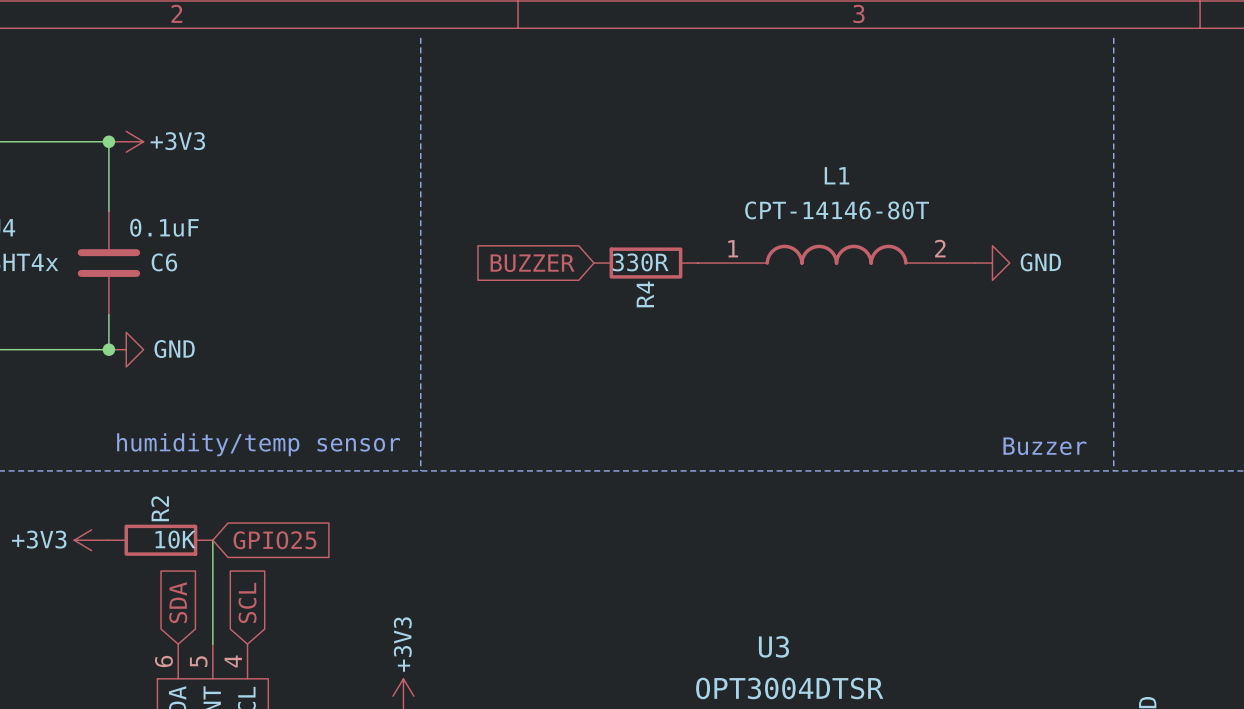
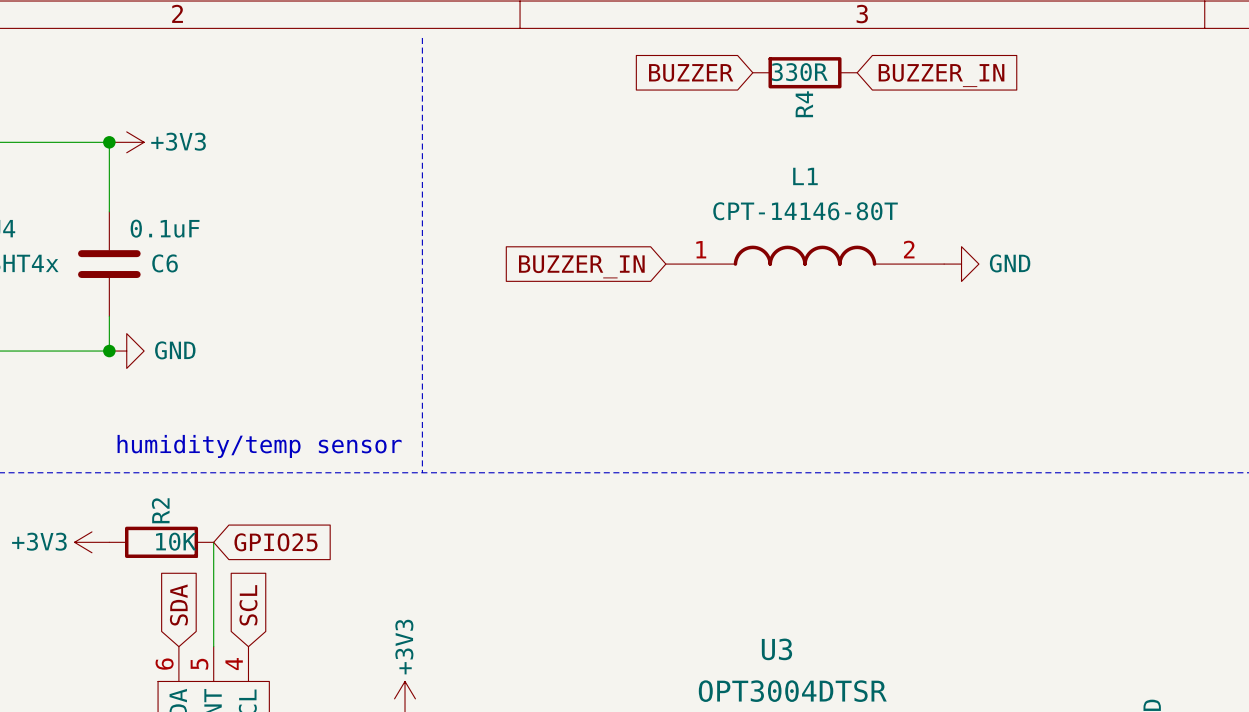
line: (1113, 37) (1113, 470) -> none
global label: none -> BUZZER_IN (941, 75)
L1 position: (836, 254) -> (805, 255)
global label position: BUZZER (532, 263) -> BUZZER (691, 72)
R4 position: (645, 263) -> (805, 72)
power symbol position: GND (992, 263) -> GND (961, 264)
global label: none -> BUZZER_IN (581, 266)
text: Buzzer (1044, 446) -> none

